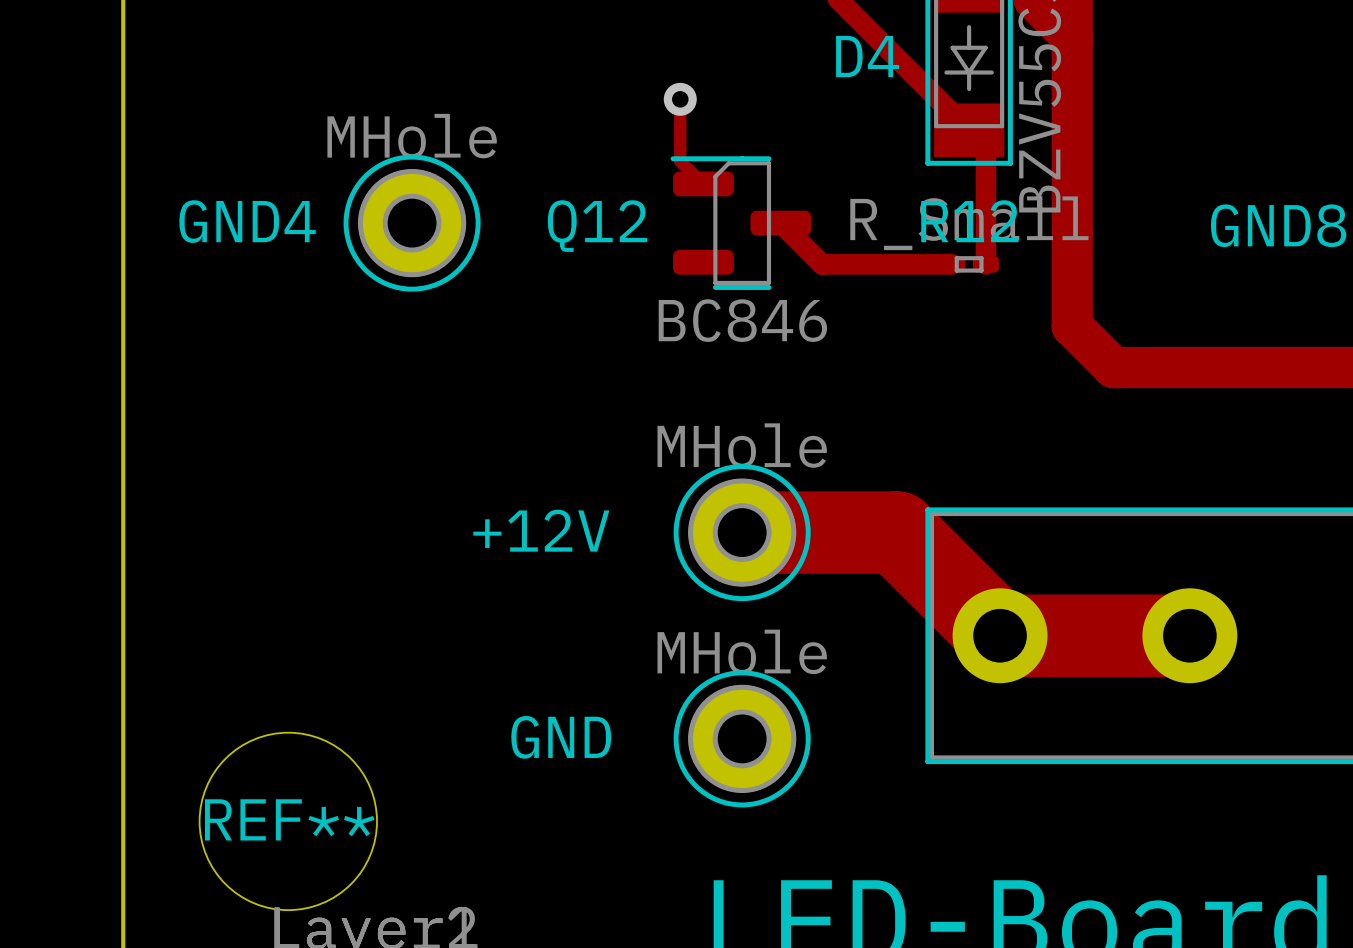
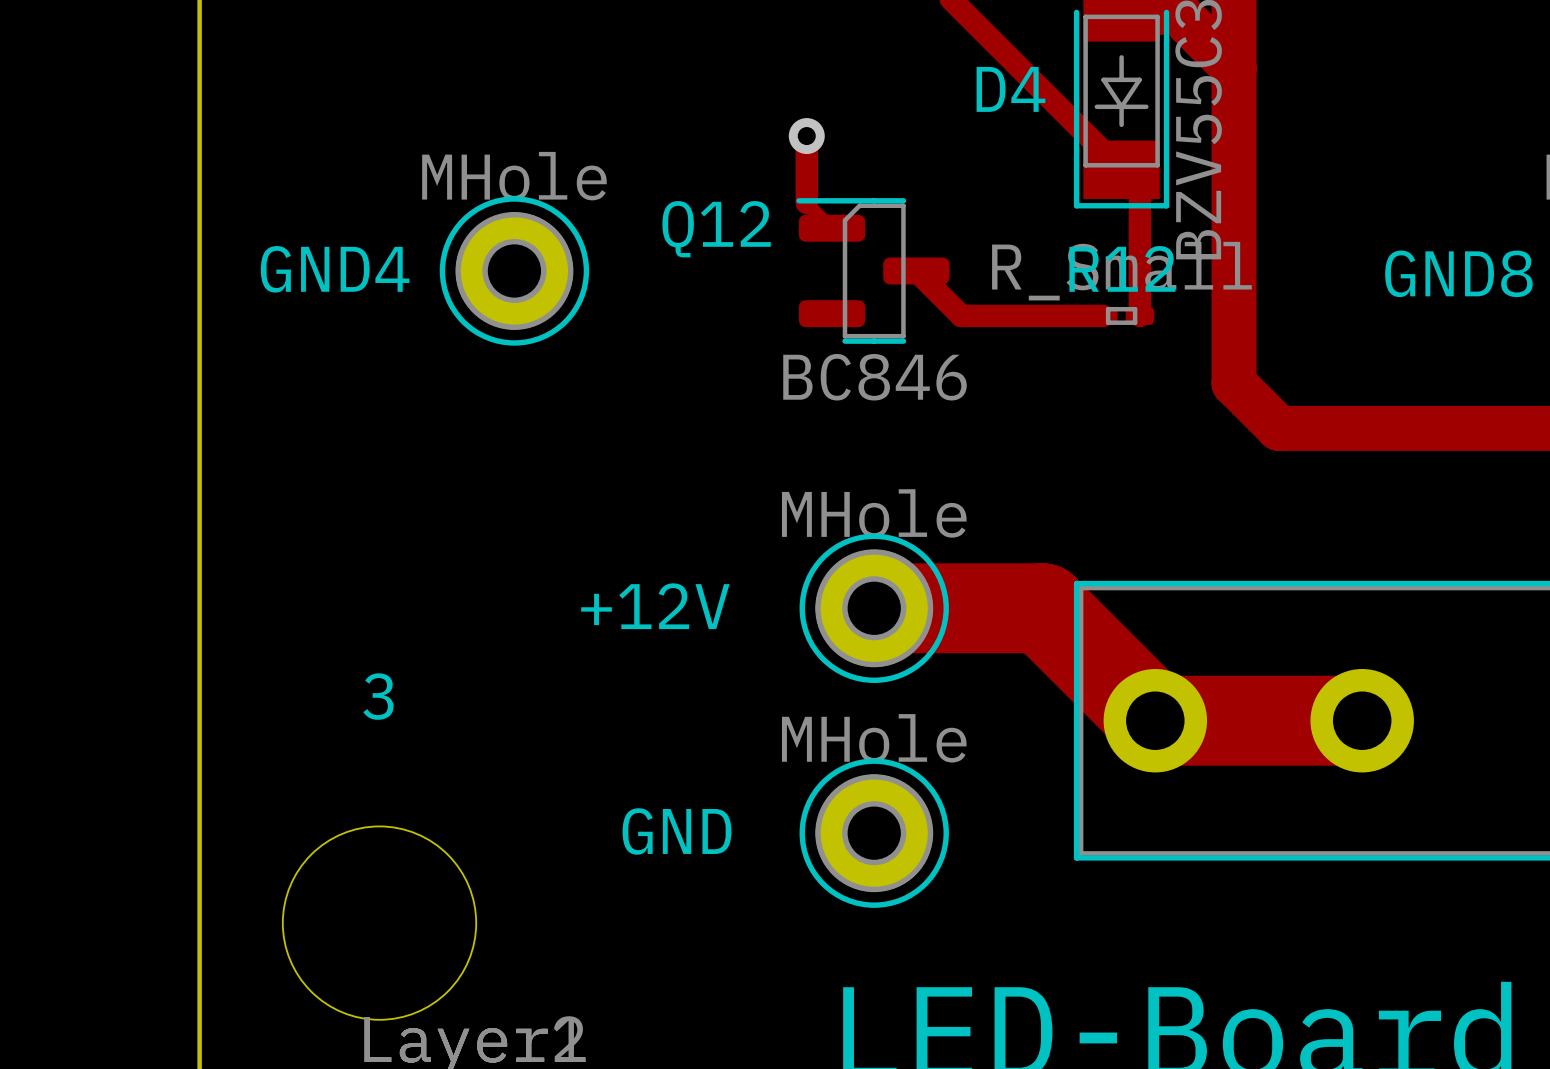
track width: thin (680, 99) (680, 161) -> thick (806, 136) (806, 203)
Q12 name position: Q12 (597, 226) -> Q12 (716, 229)
REF** name: REF** (289, 819) -> 3 (378, 696)

